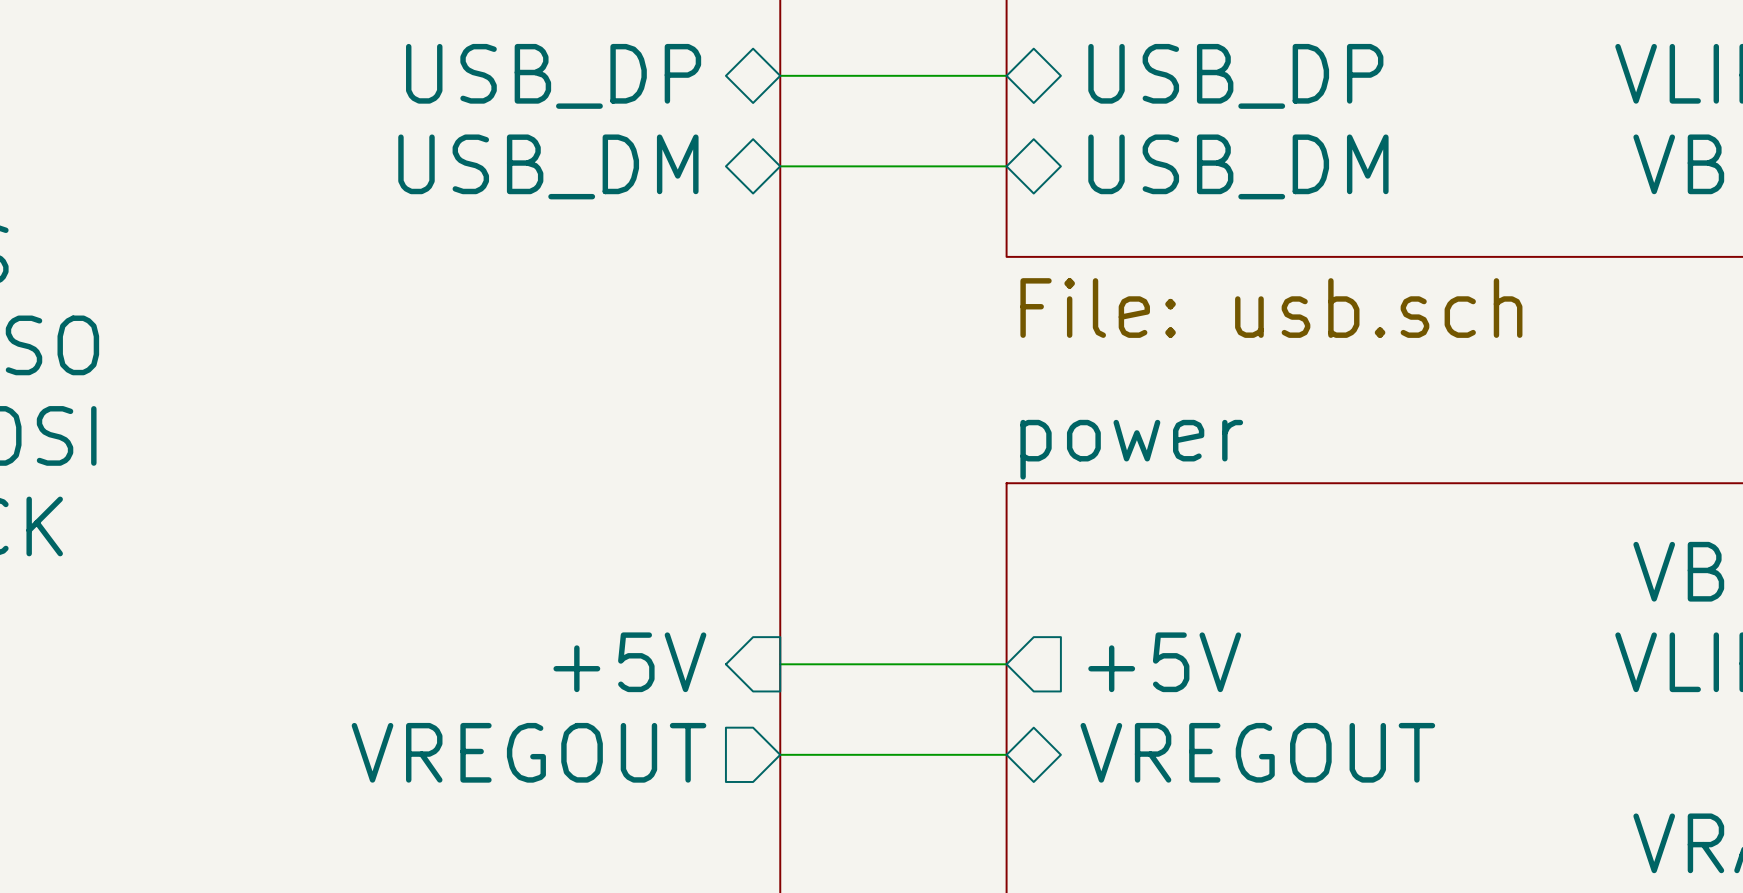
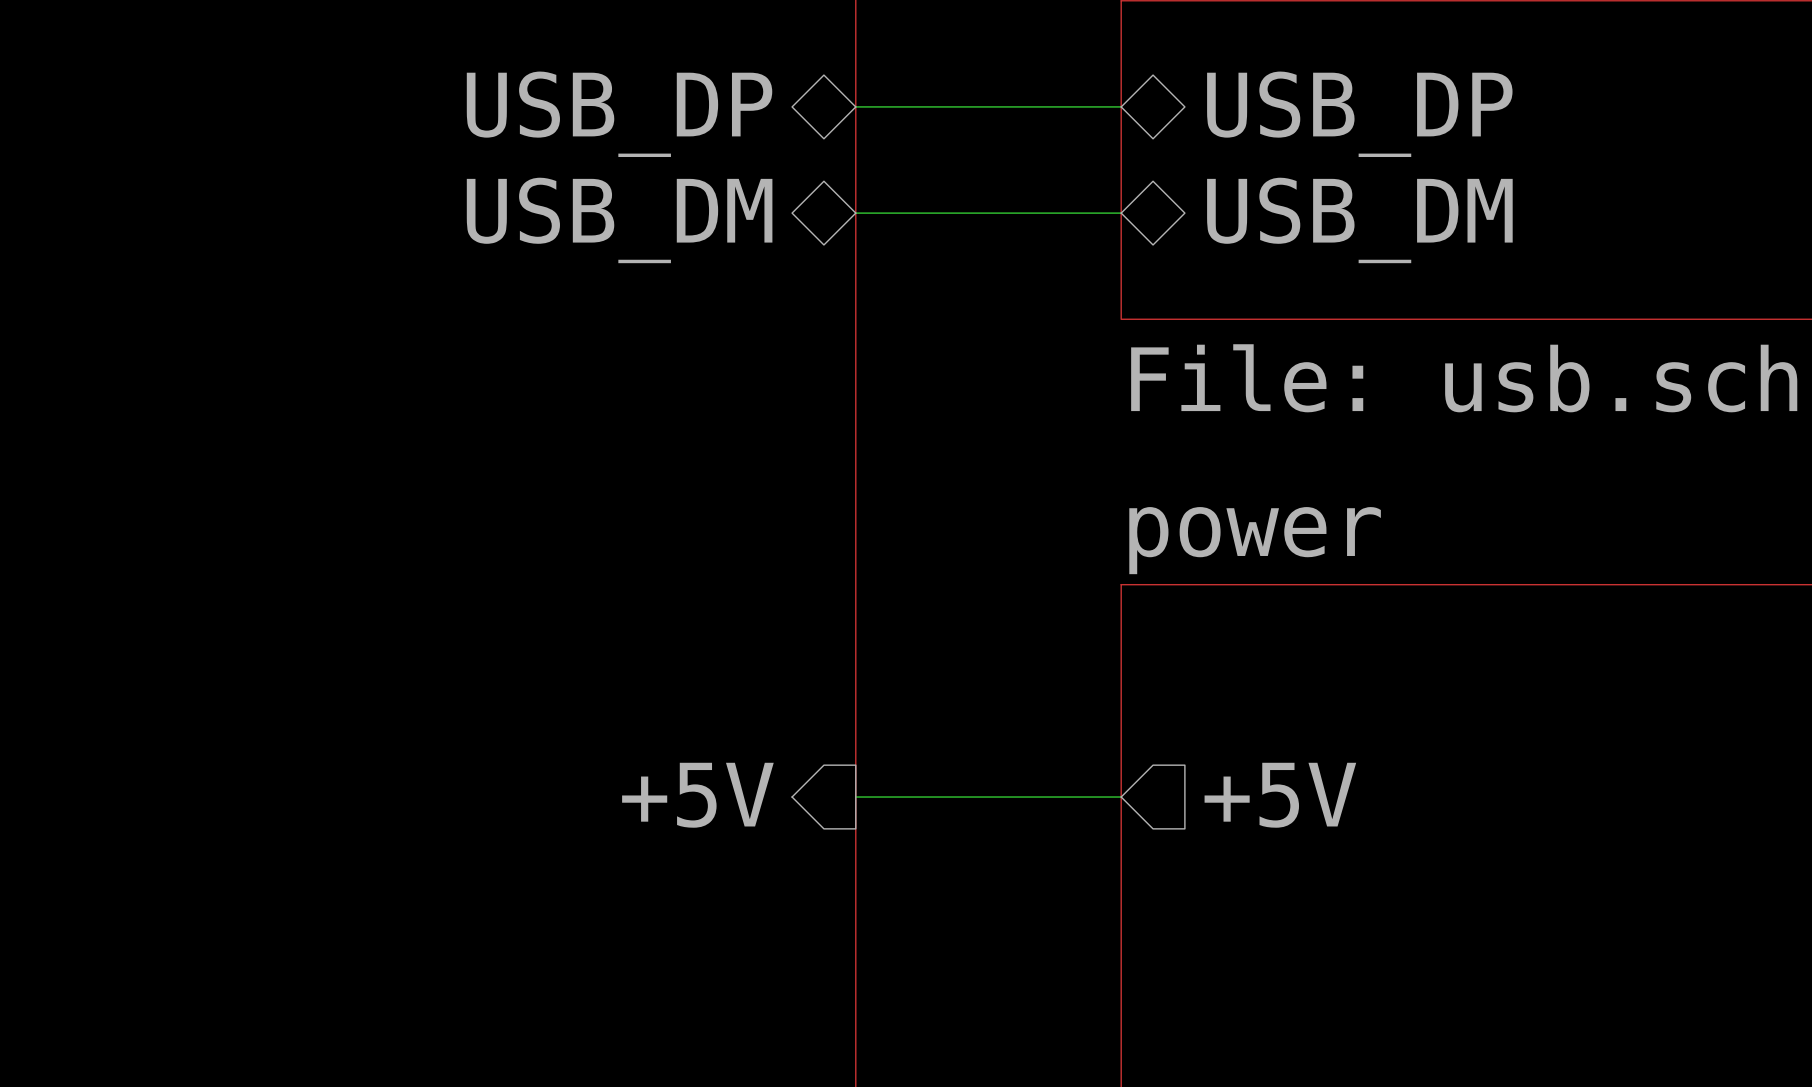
sheet pin: VREGOUT (529, 752) -> none
sheet pin: VREGOUT (1257, 752) -> none
wire: (780, 754) (1006, 754) -> none

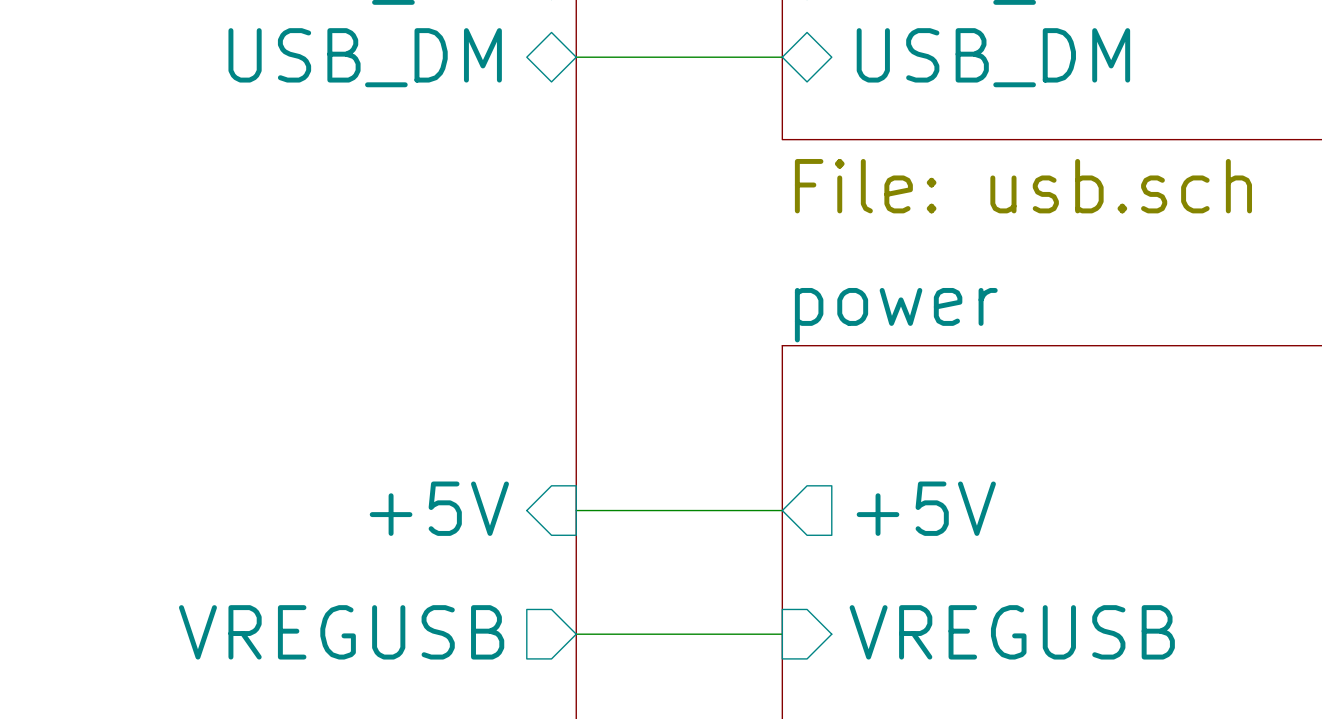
sheet pin: none -> VREGUSB (341, 632)
sheet pin: none -> VREGUSB (1012, 632)
wire: none -> (576, 634) (782, 634)

